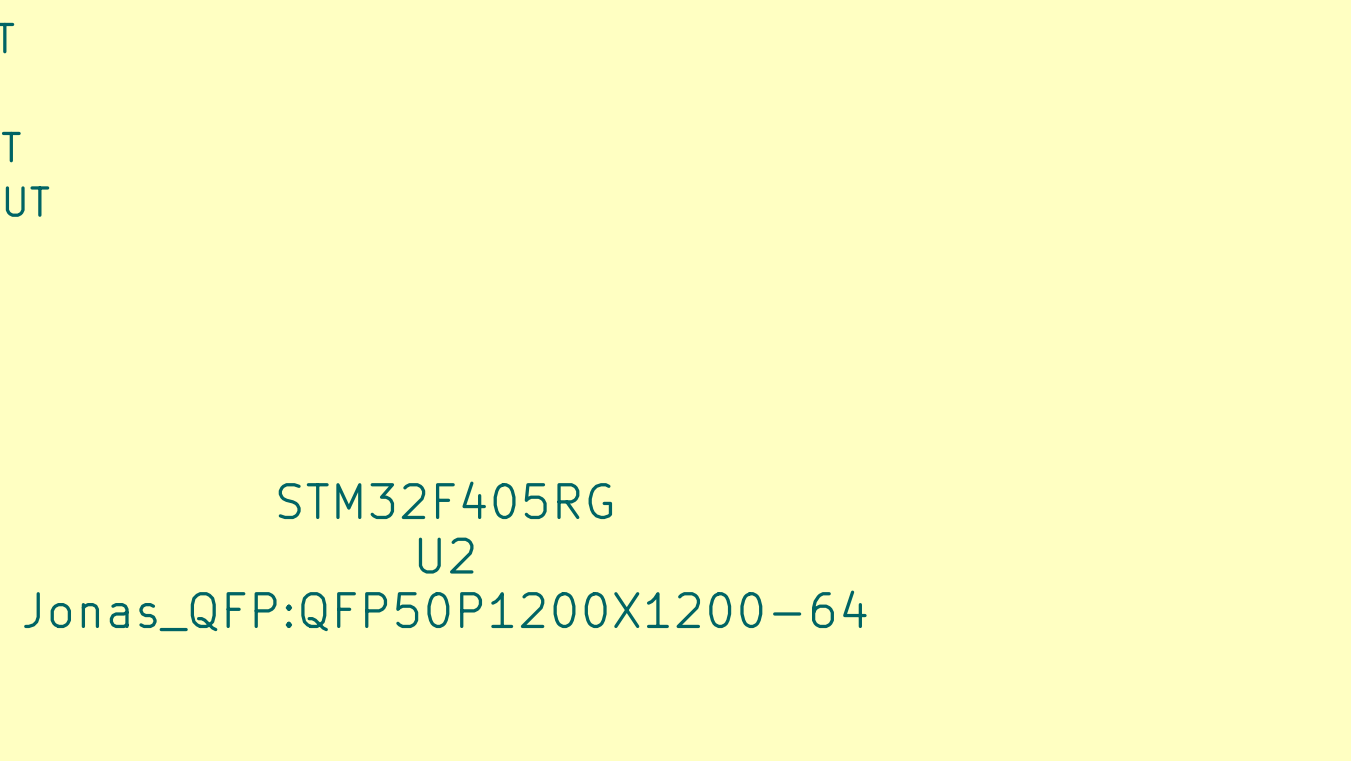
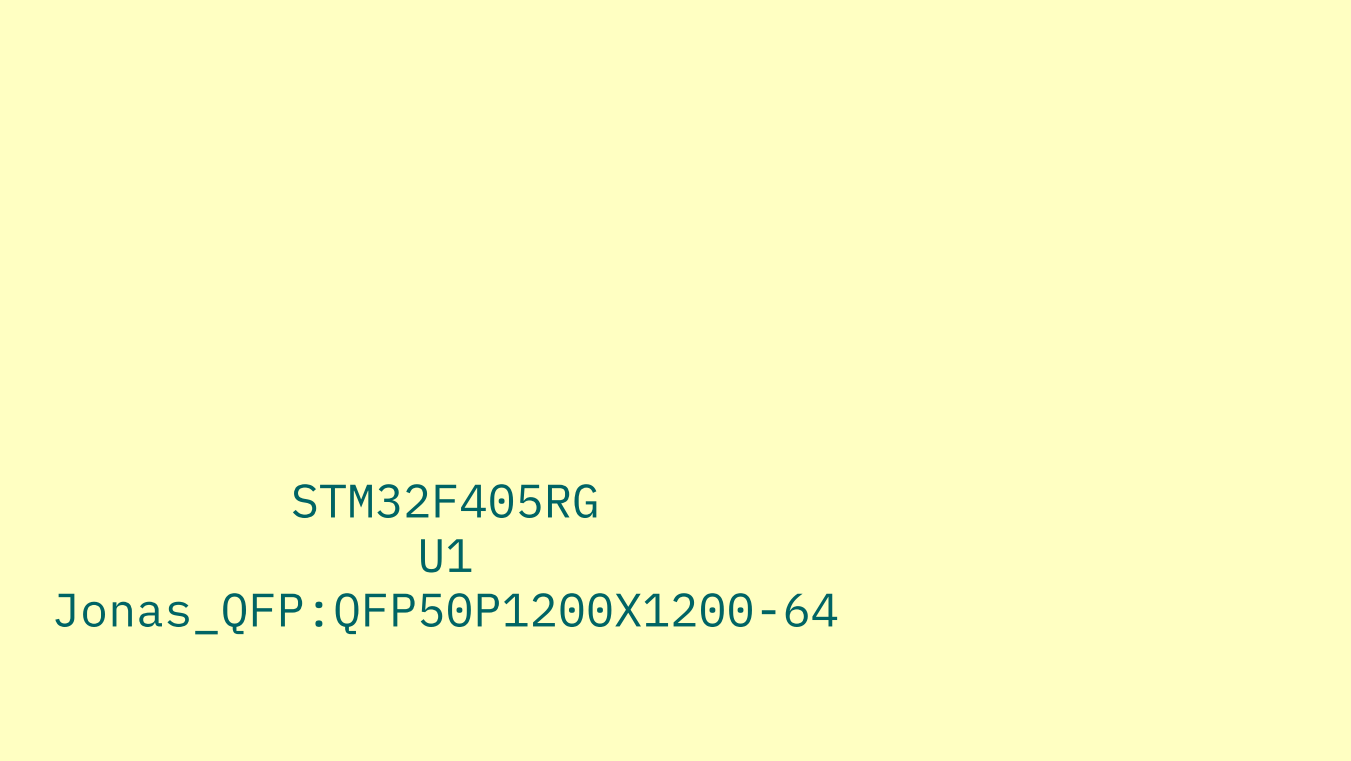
U2 name: U2 (446, 555) -> U1 (446, 555)

